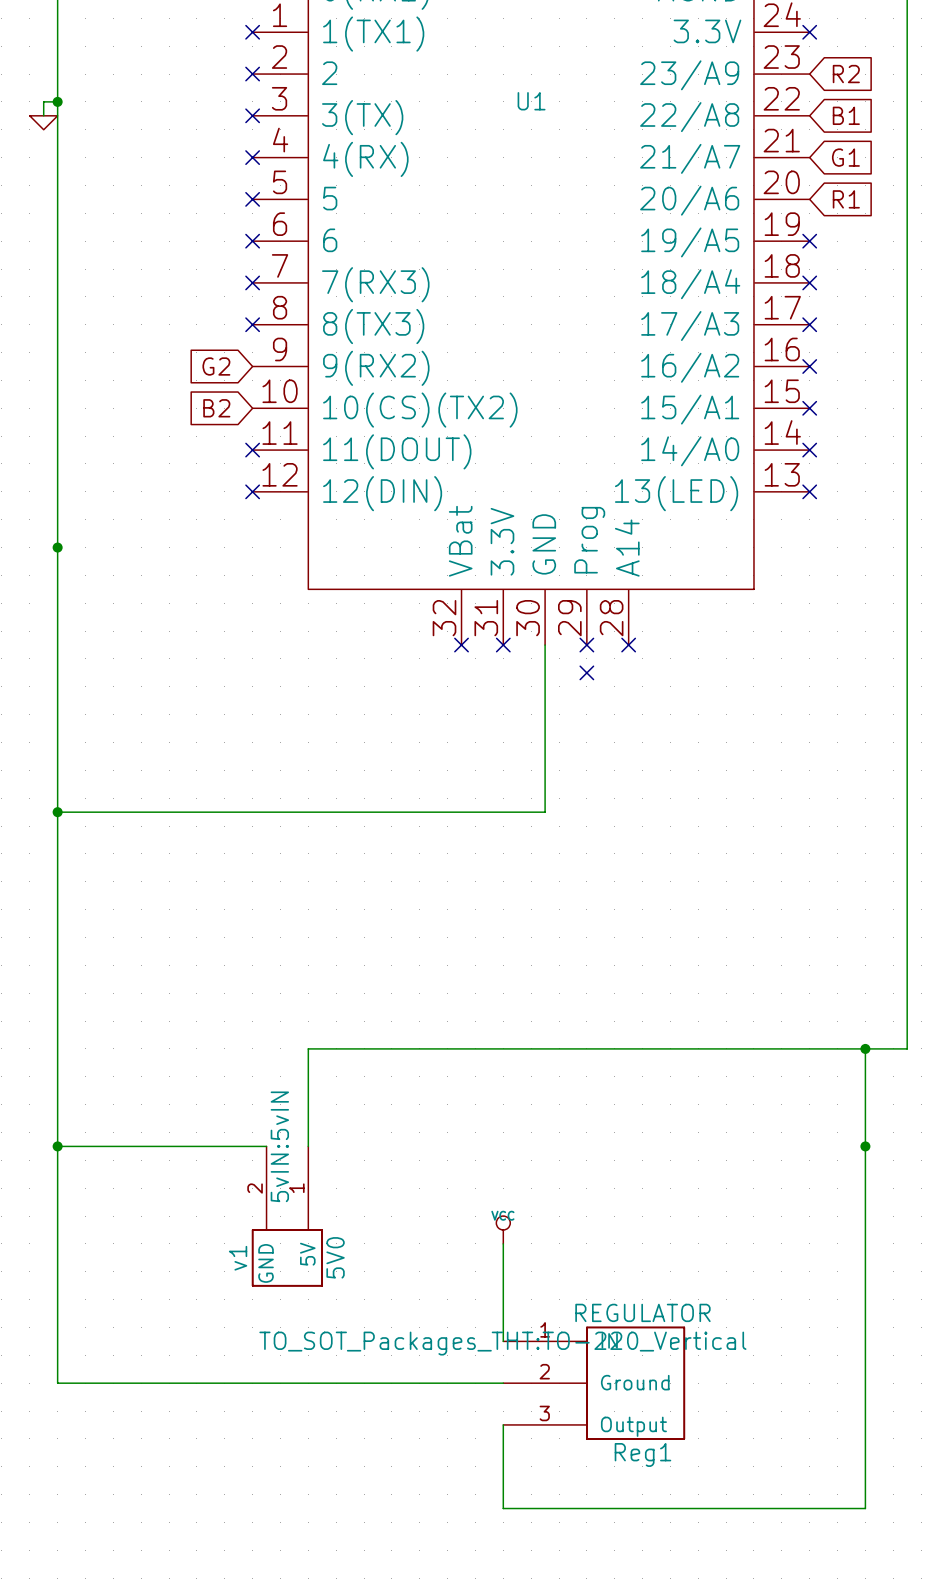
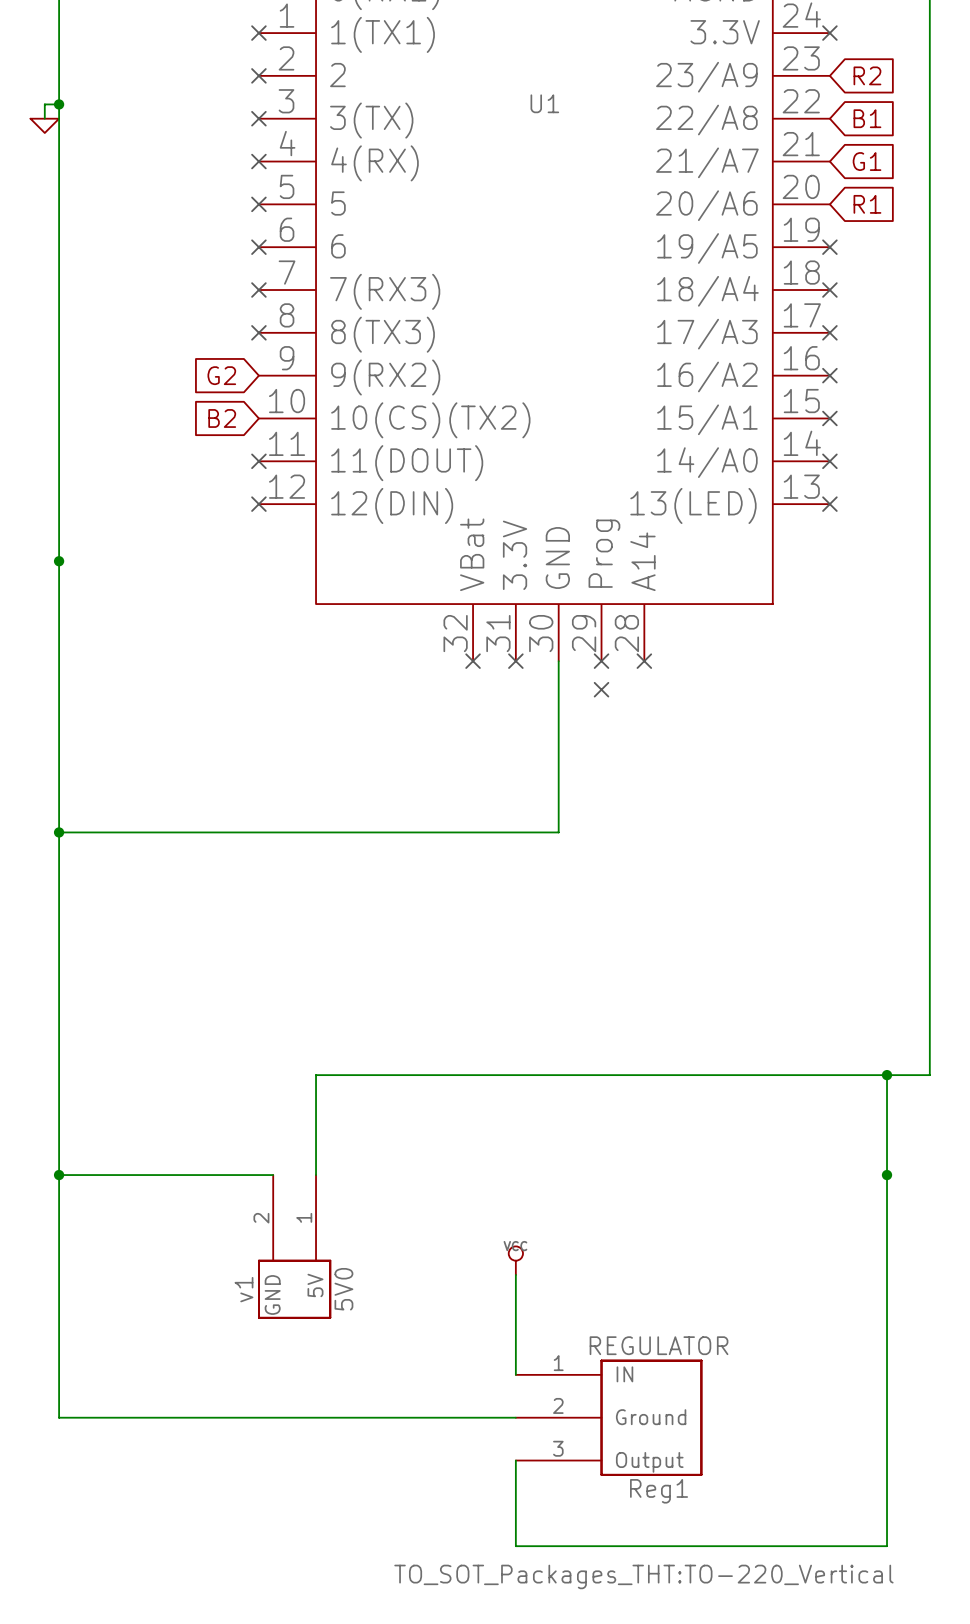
v1 text: 5vIN:5vIN (279, 1146) -> none
Reg1 text position: TO_SOT_Packages_THT:TO-220_Vertical (502, 1343) -> TO_SOT_Packages_THT:TO-220_Vertical (643, 1576)

